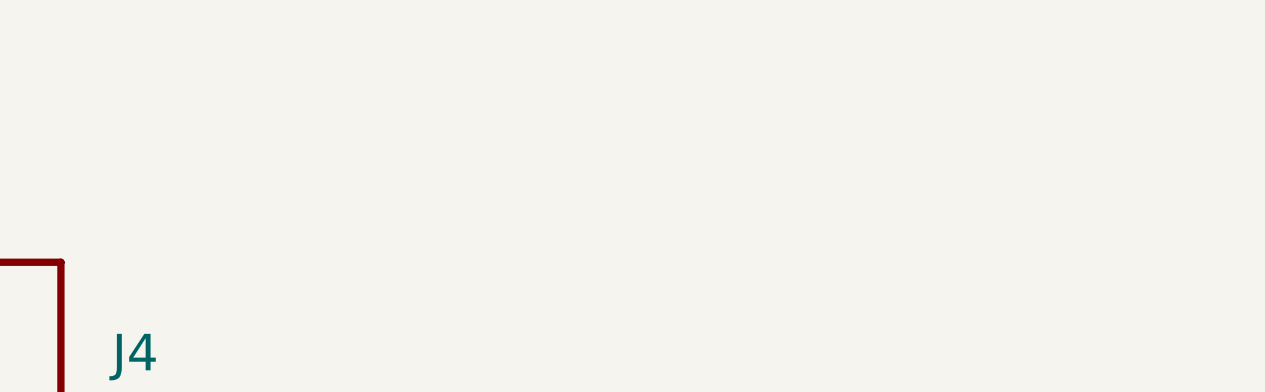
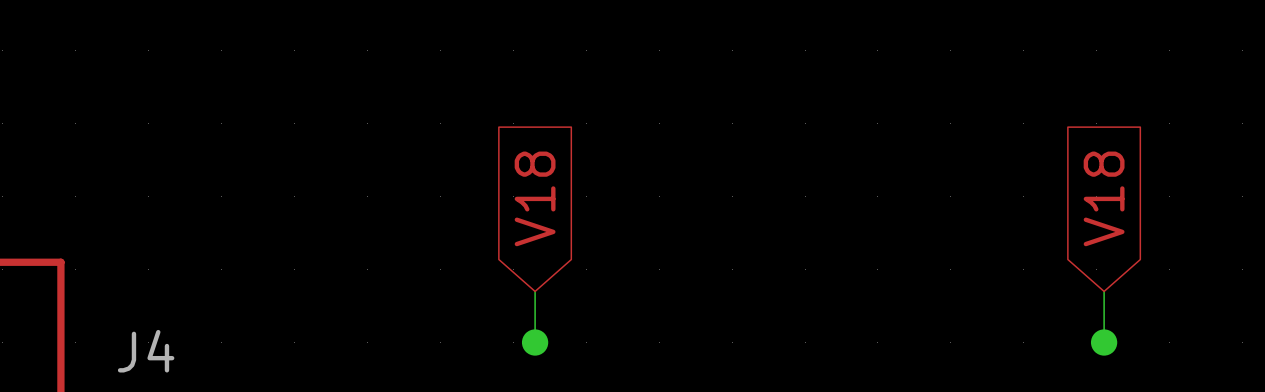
global label: none -> V18 (535, 198)
global label: none -> V18 (1104, 198)
wire: none -> (535, 291) (535, 342)
wire: none -> (1104, 291) (1104, 342)
junction: none -> (535, 342)
junction: none -> (1104, 342)

